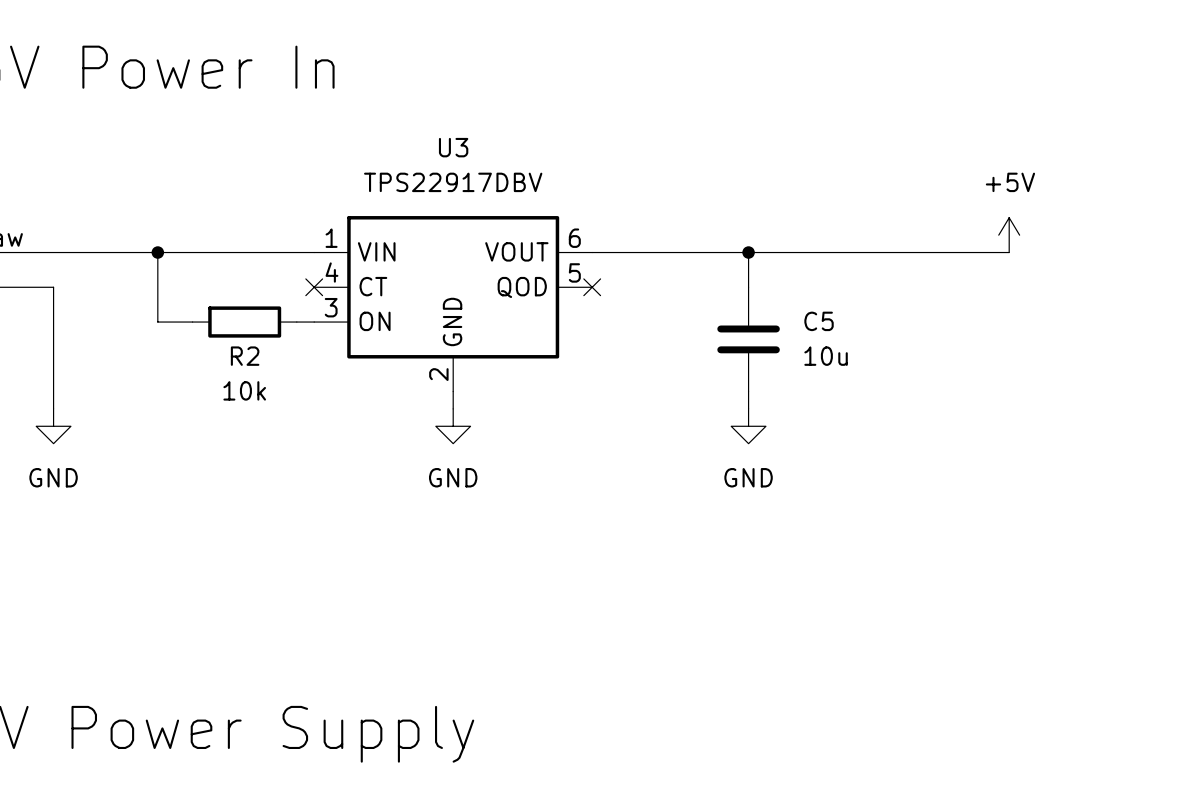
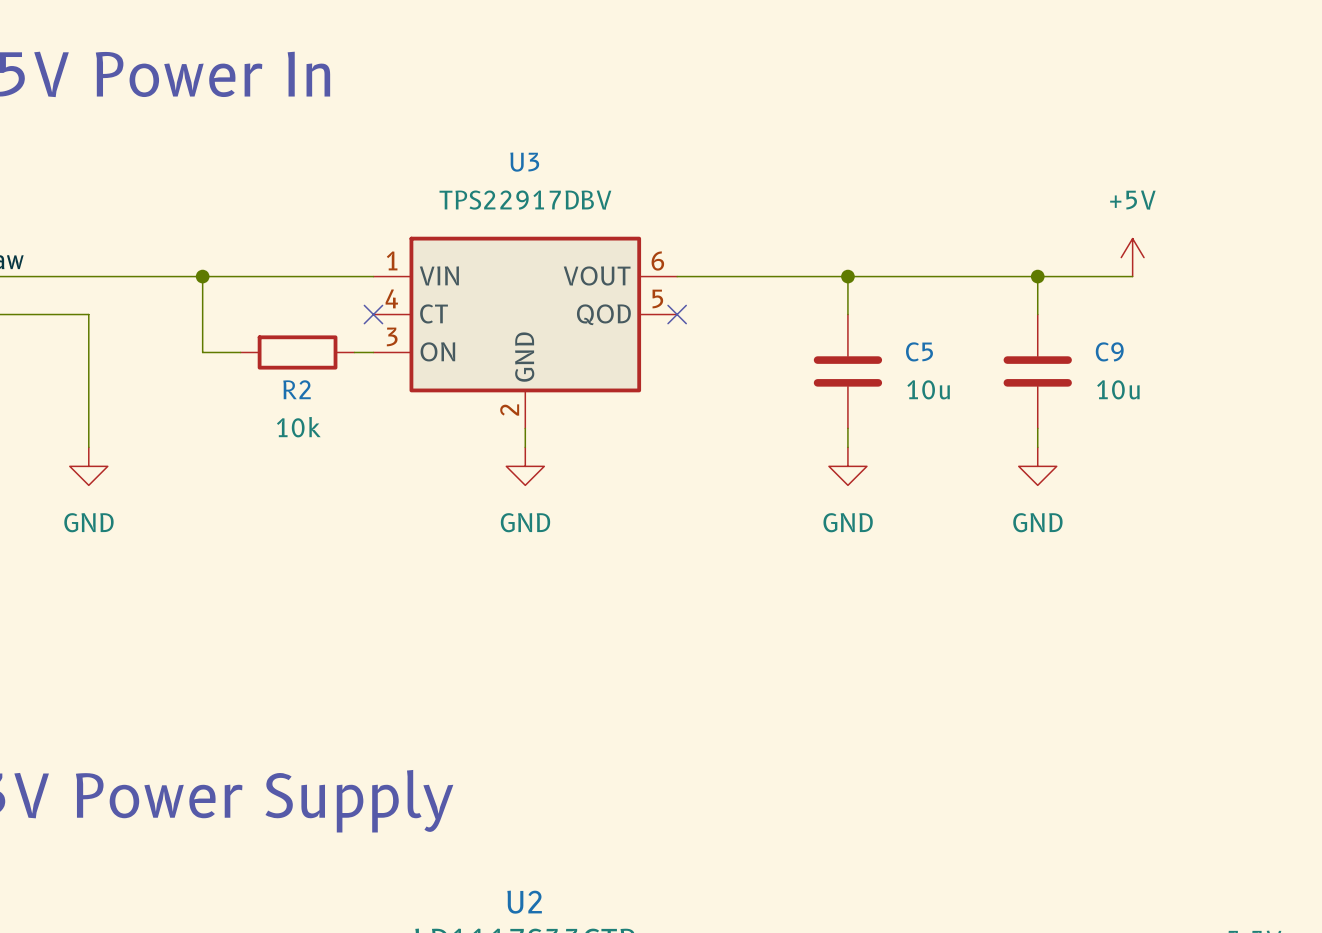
wire: none -> (1037, 276) (1037, 314)
junction: none -> (1037, 276)
C9: none -> 10u (1037, 371)
wire: none -> (1037, 428) (1037, 447)
power symbol: none -> GND (1037, 466)

